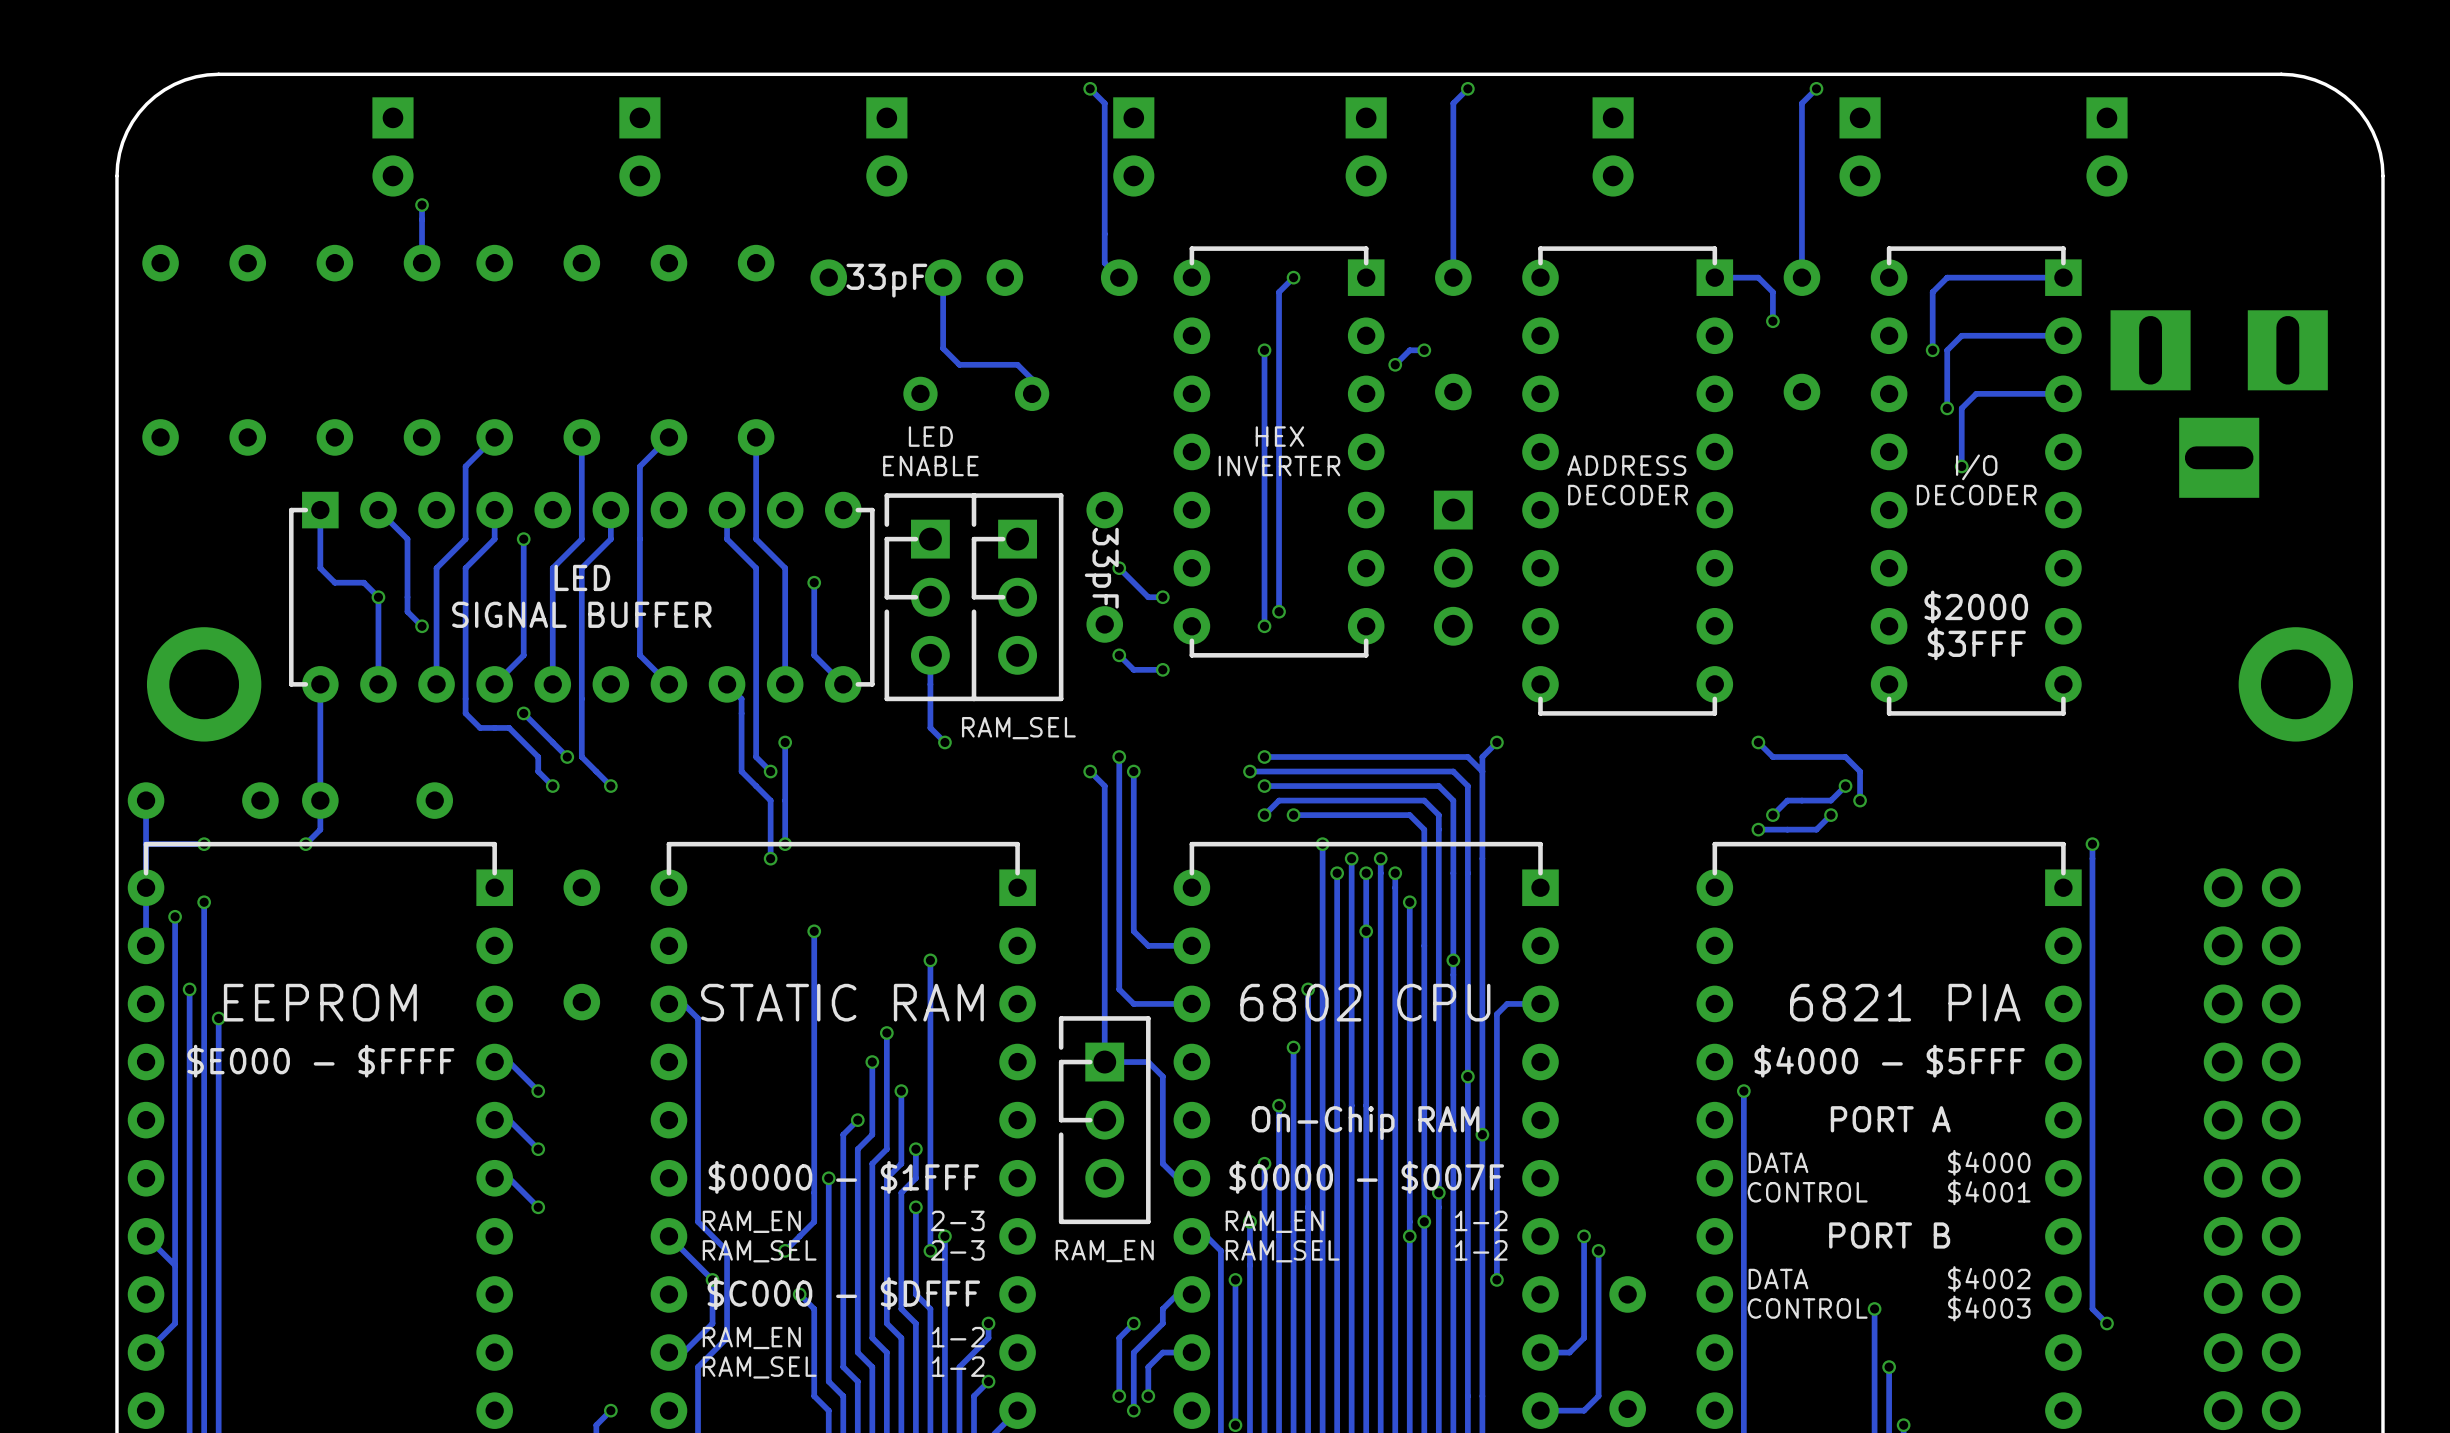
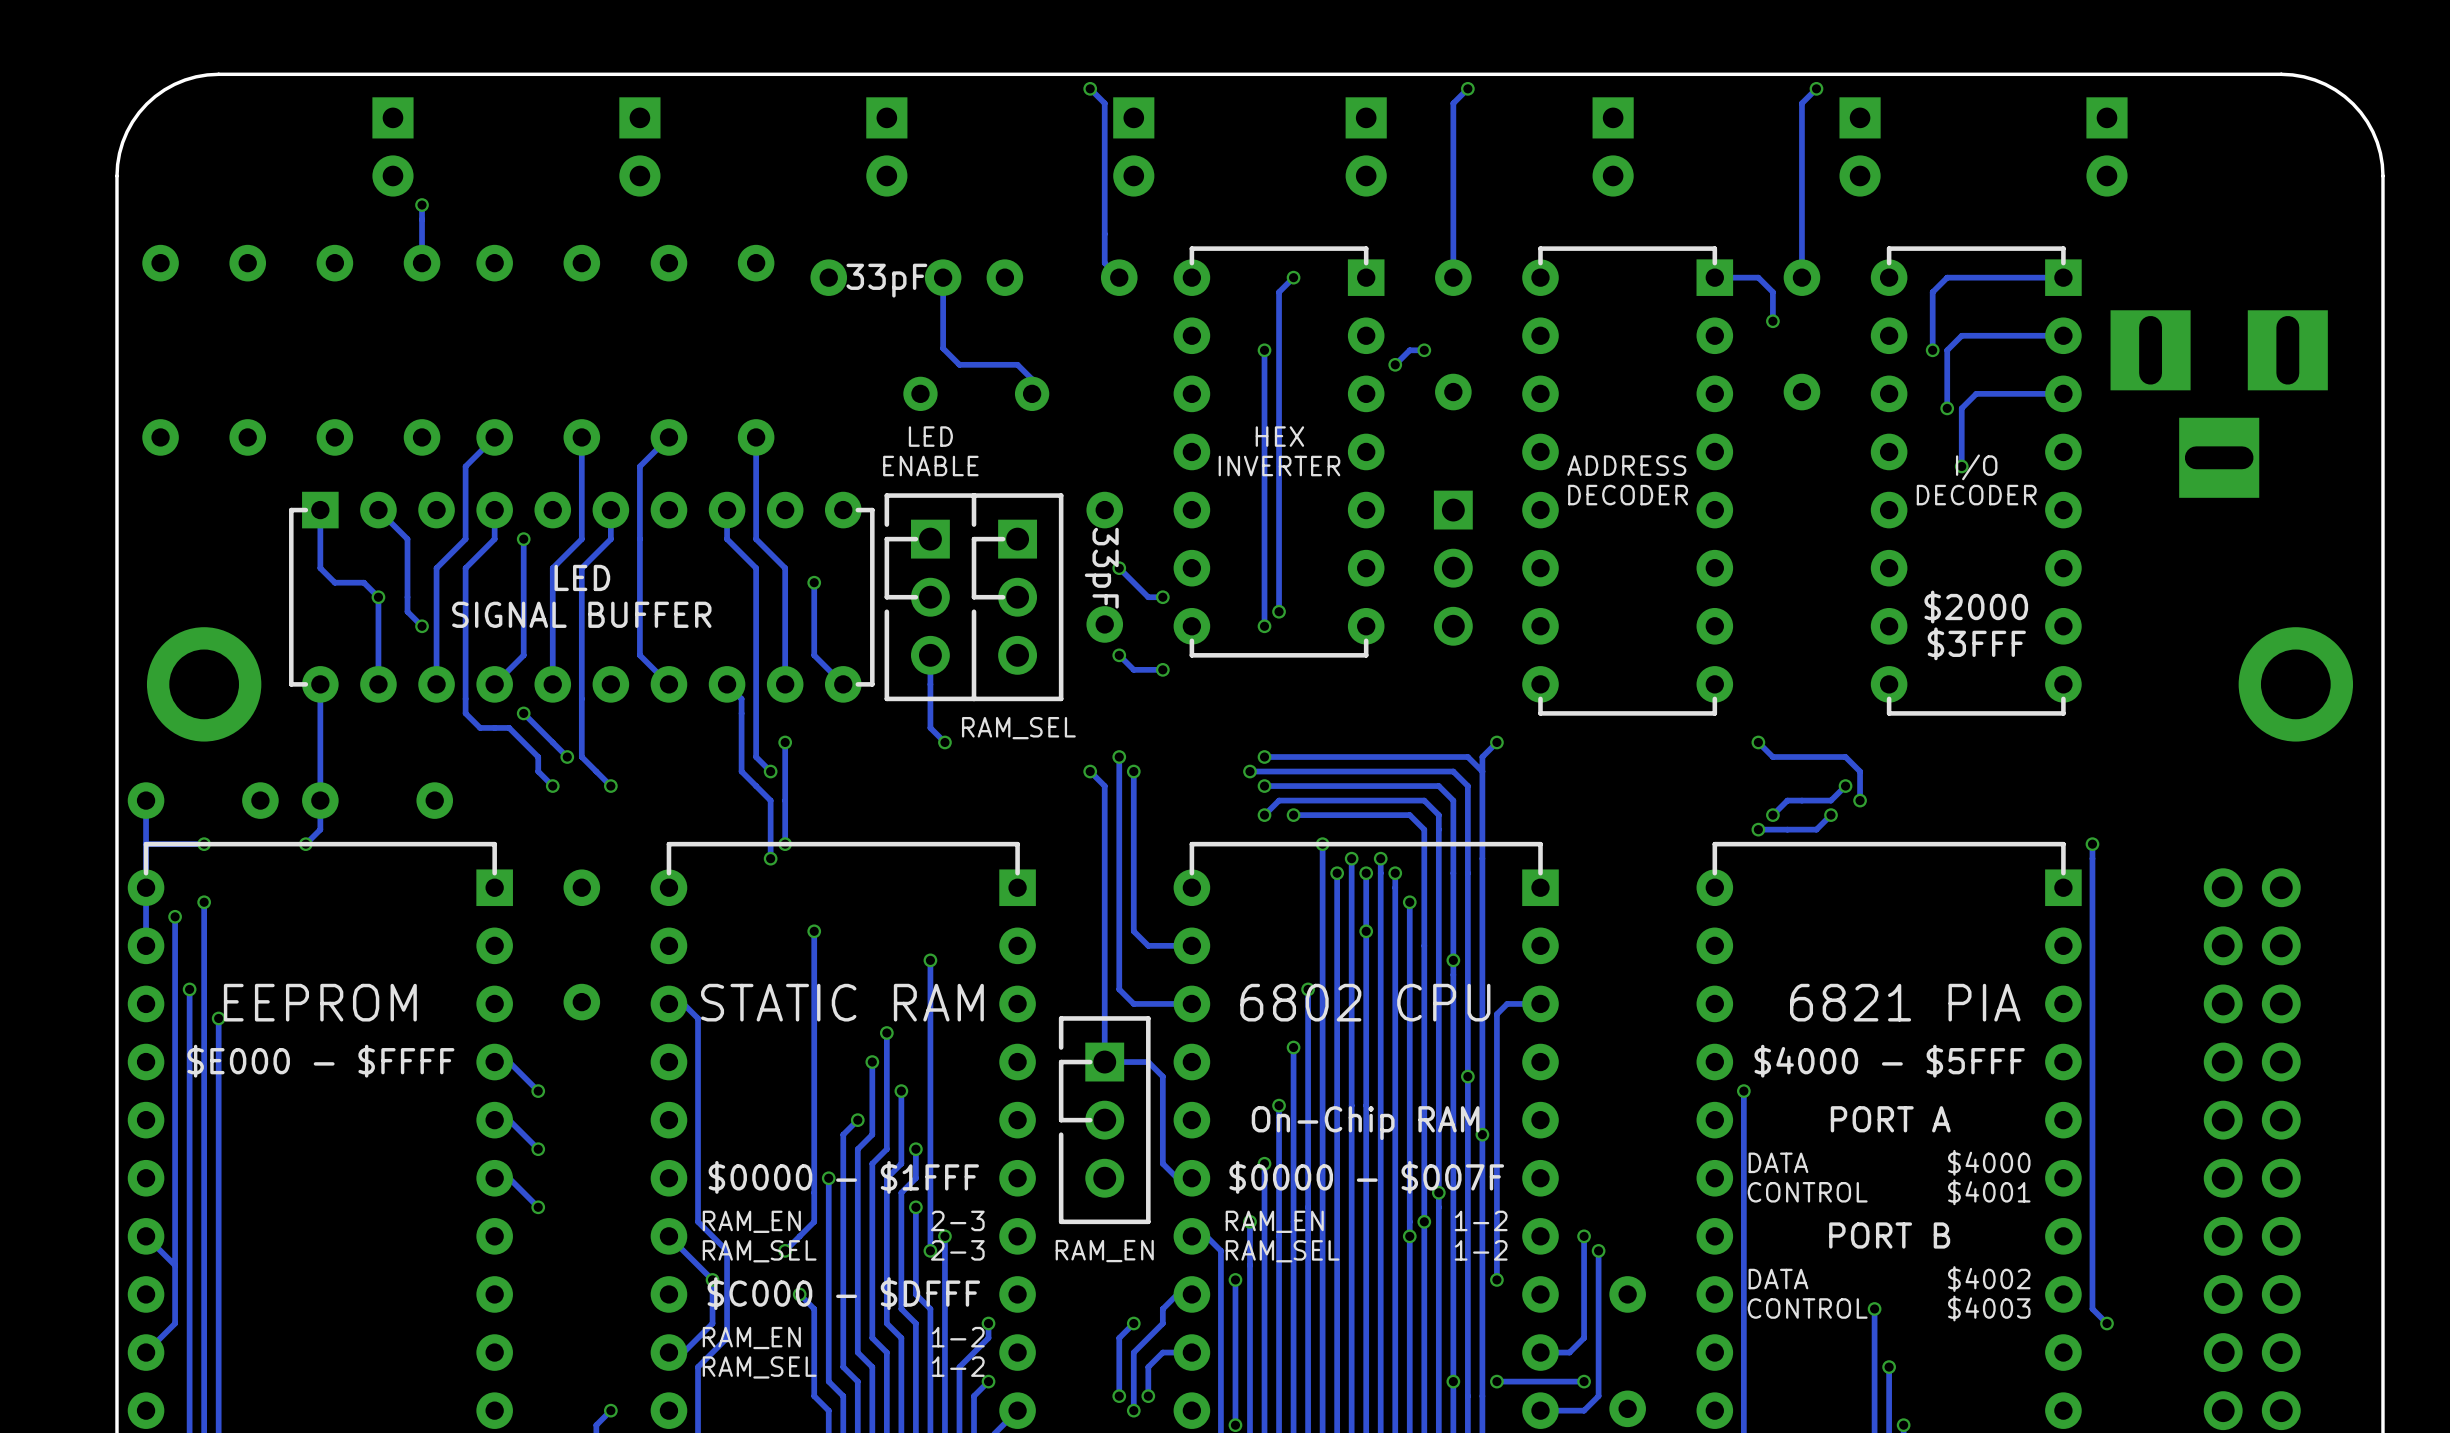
via: none -> (1453, 1381)
via: none -> (1496, 1381)
track: none -> (1584, 1381) (1496, 1381)
via: none -> (1584, 1381)

